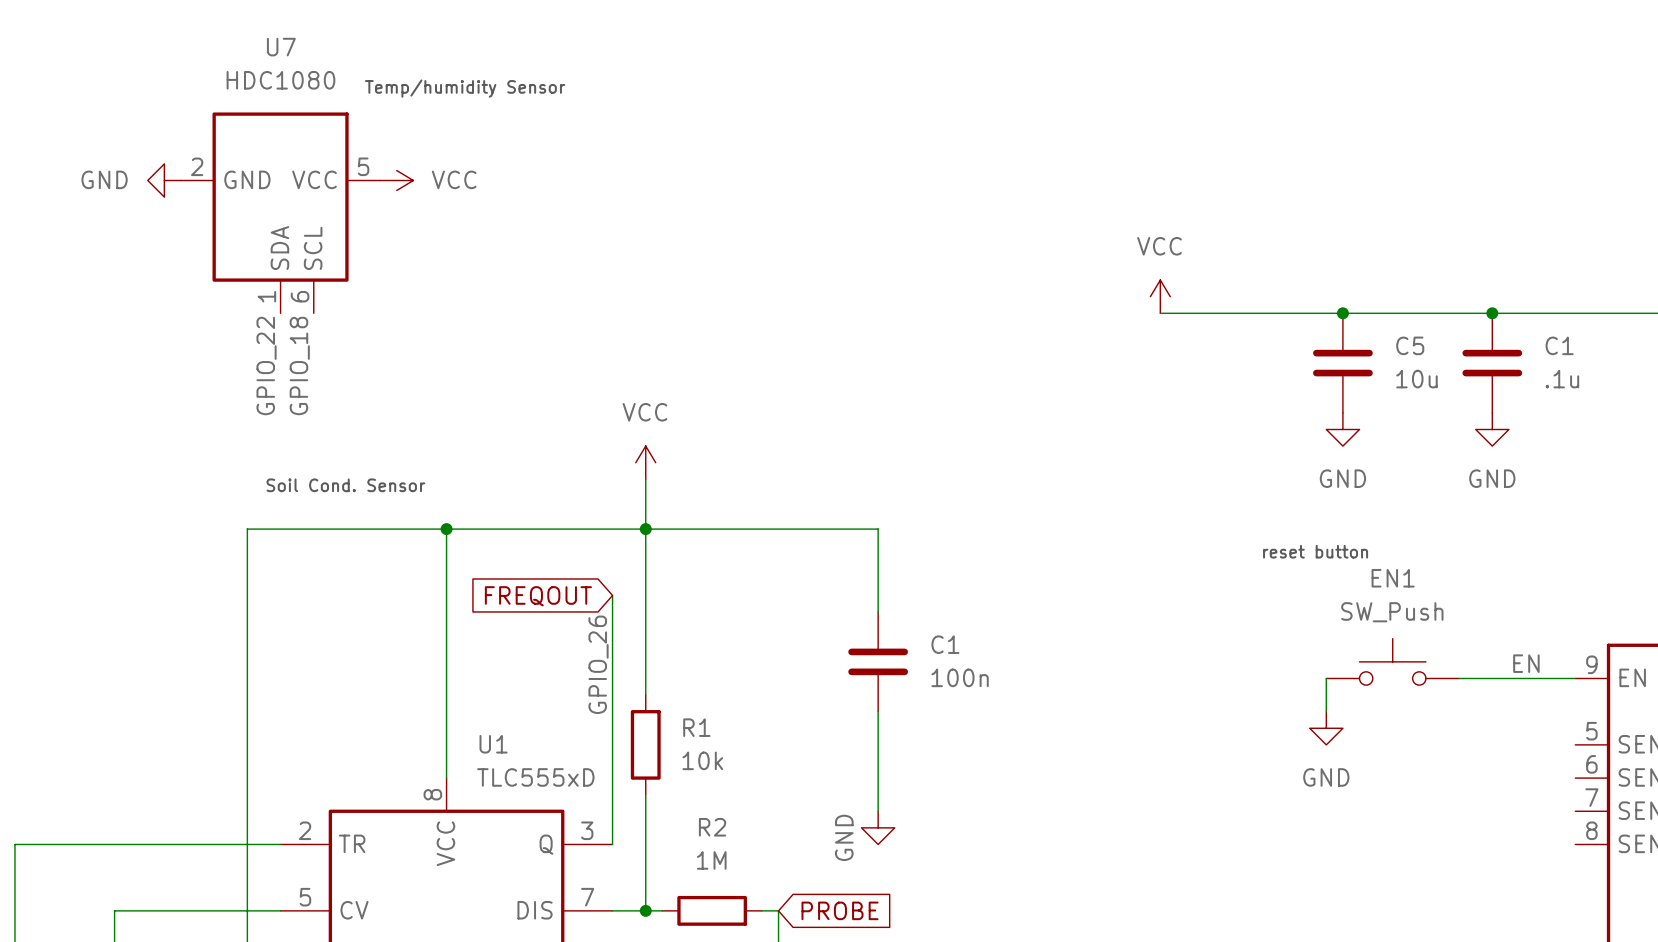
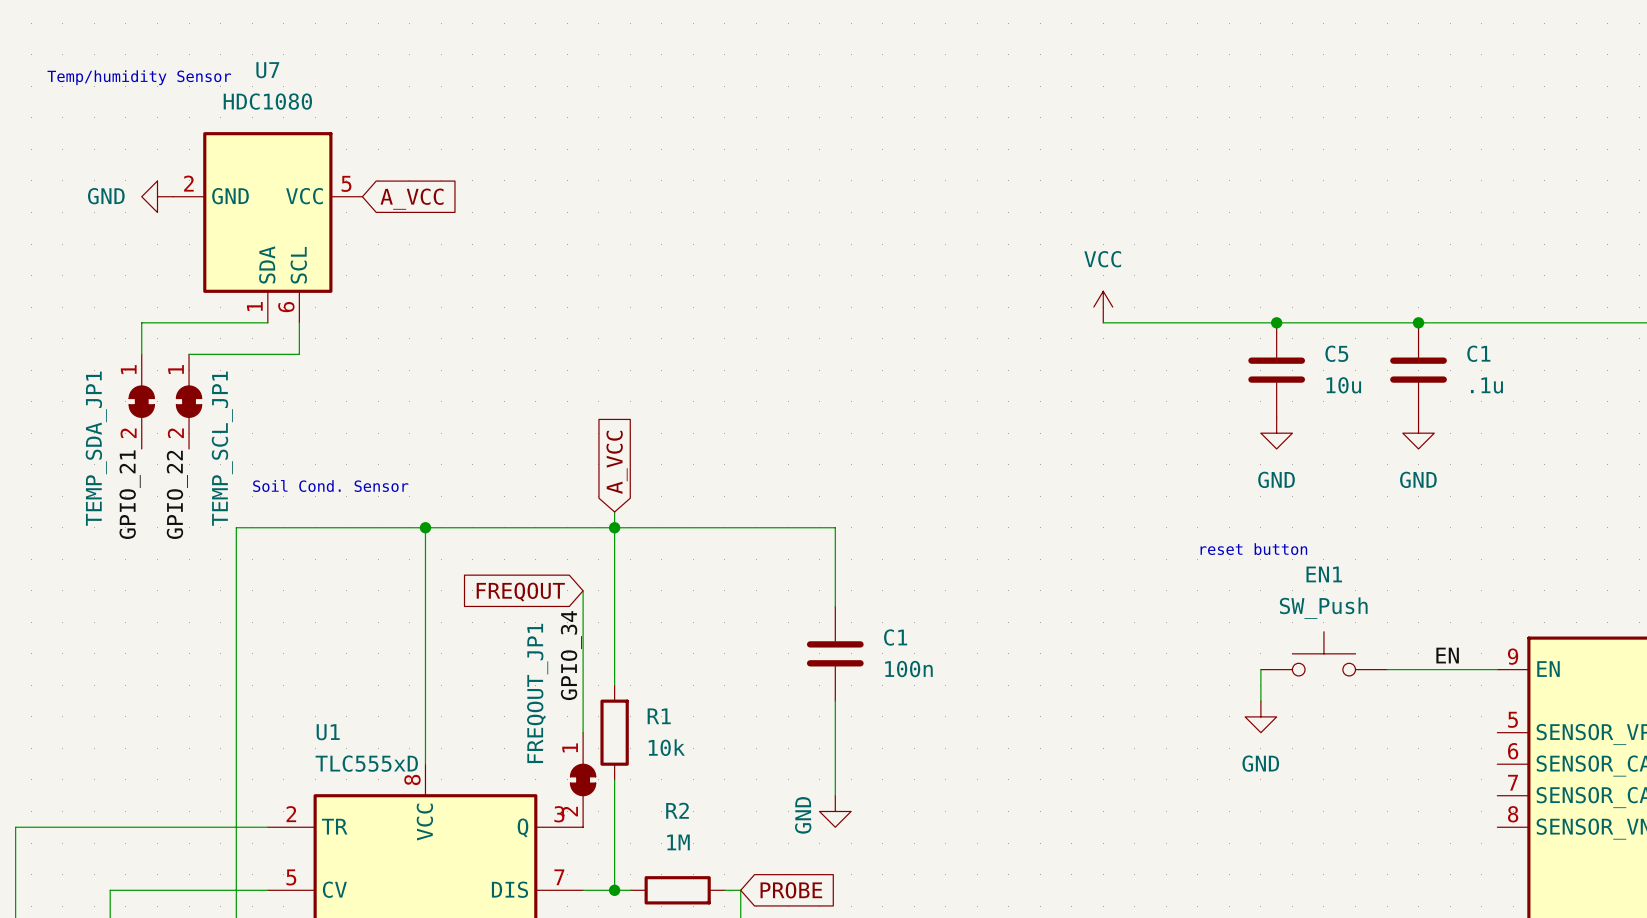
text position: Temp/humidity Sensor (465, 88) -> Temp/humidity Sensor (139, 77)
power symbol: VCC (396, 180) -> none
global label: none -> A_VCC (412, 199)
wire: none -> (267, 322) (141, 322) (141, 354)
wire: none -> (299, 322) (299, 354) (189, 354)
label position: GPIO_22 (266, 365) -> GPIO_22 (177, 494)
label: GPIO_18 (299, 365) -> none
TEMP_SDA_JP1: none -> (141, 401)
TEMP_SCL_JP1: none -> (189, 401)
global label: none -> A_VCC (617, 462)
power symbol: VCC (645, 462) -> none
wire: (645, 479) (645, 512) -> none
label: none -> GPIO_21 (130, 494)
label: GPIO_26 (598, 664) -> GPIO_34 (571, 655)
U1 name position: U1 (493, 744) -> U1 (328, 732)
U1 value position: TLC555xD (535, 777) -> TLC555xD (366, 763)
FREQOUT_JP1: none -> (583, 779)

